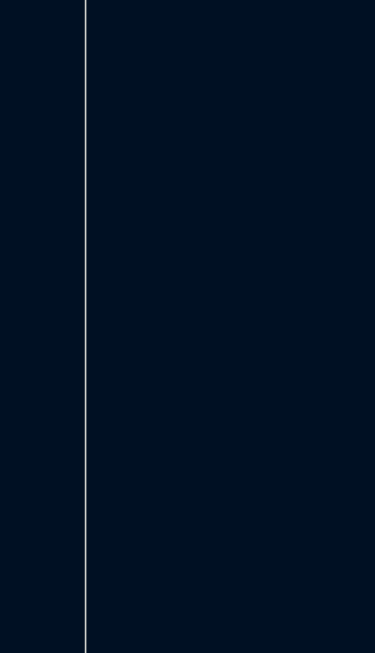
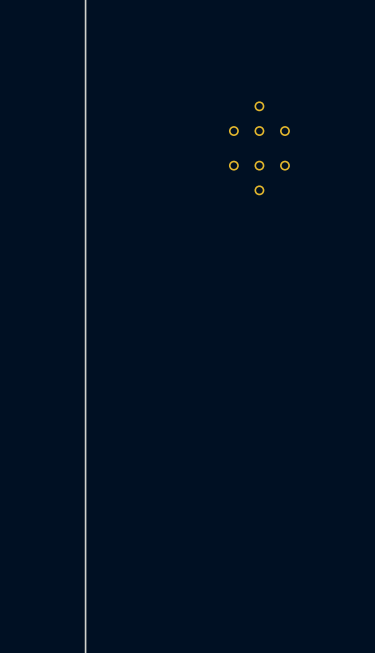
part: none -> (259, 148)

